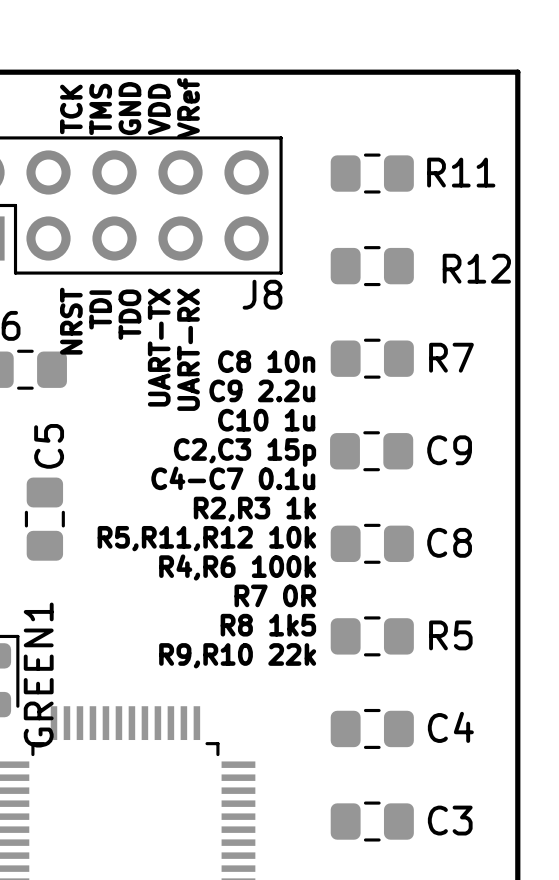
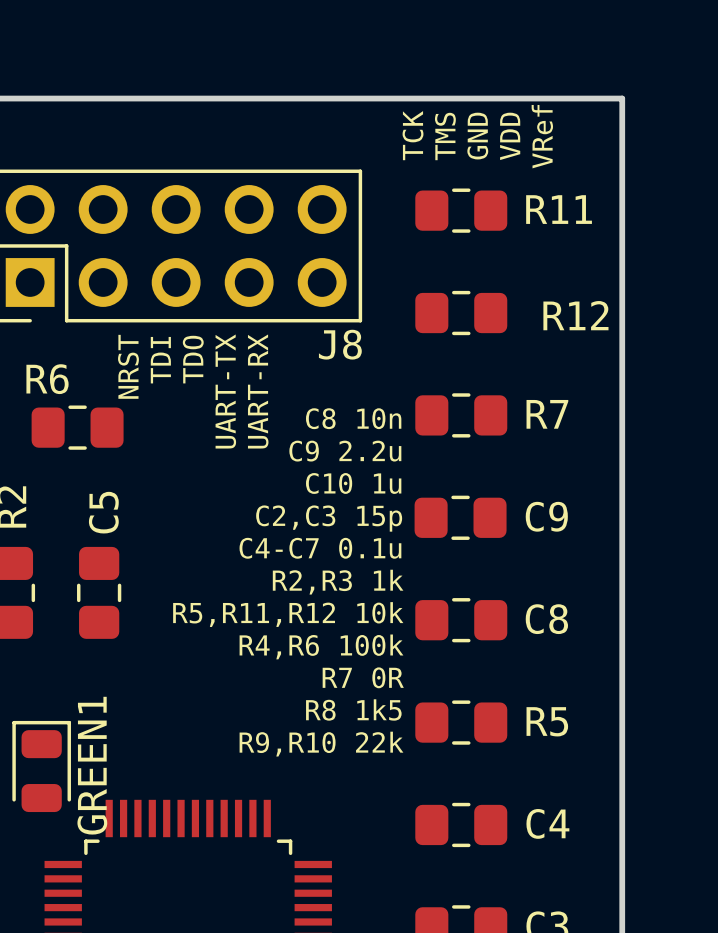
text position: GND (129, 108) -> GND (477, 136)
text position: VRef (188, 108) -> VRef (542, 136)
text position: TCK (71, 109) -> TCK (413, 135)
text position: TMS (100, 109) -> TMS (445, 136)
text position: VDD (159, 109) -> VDD (510, 136)

